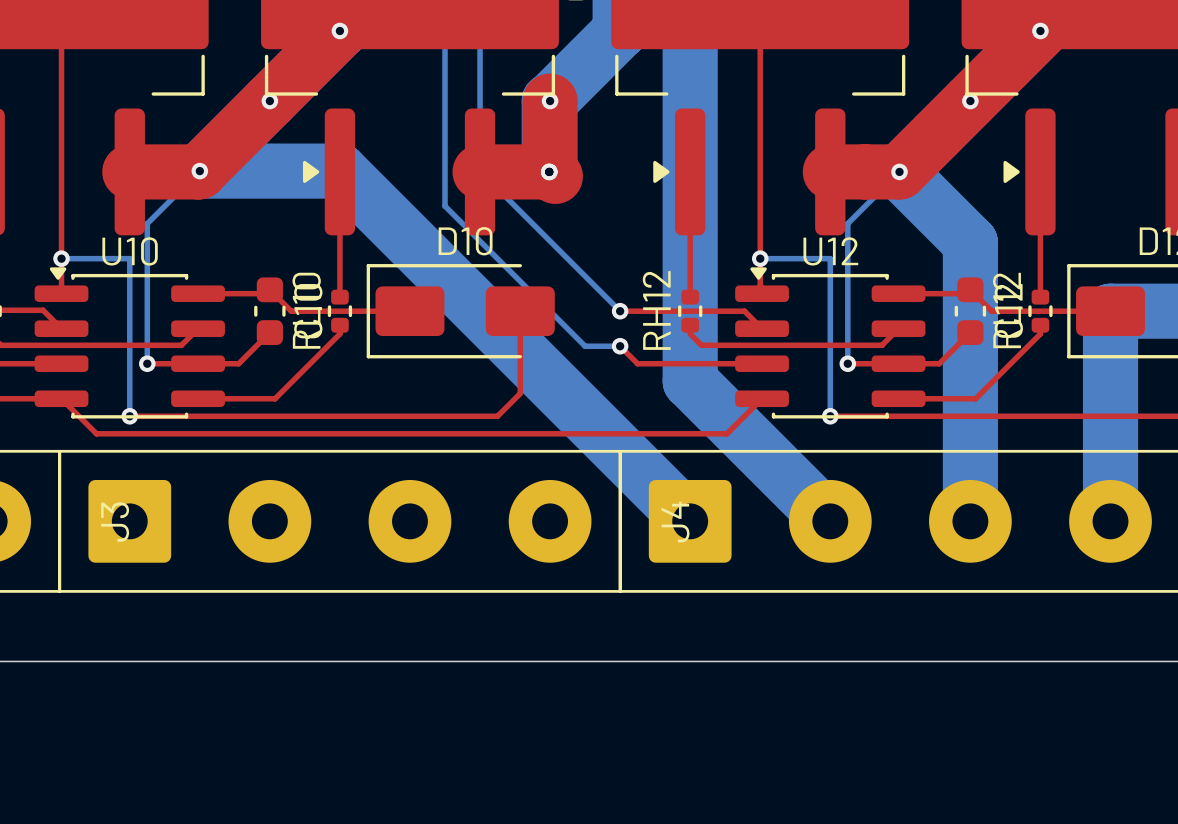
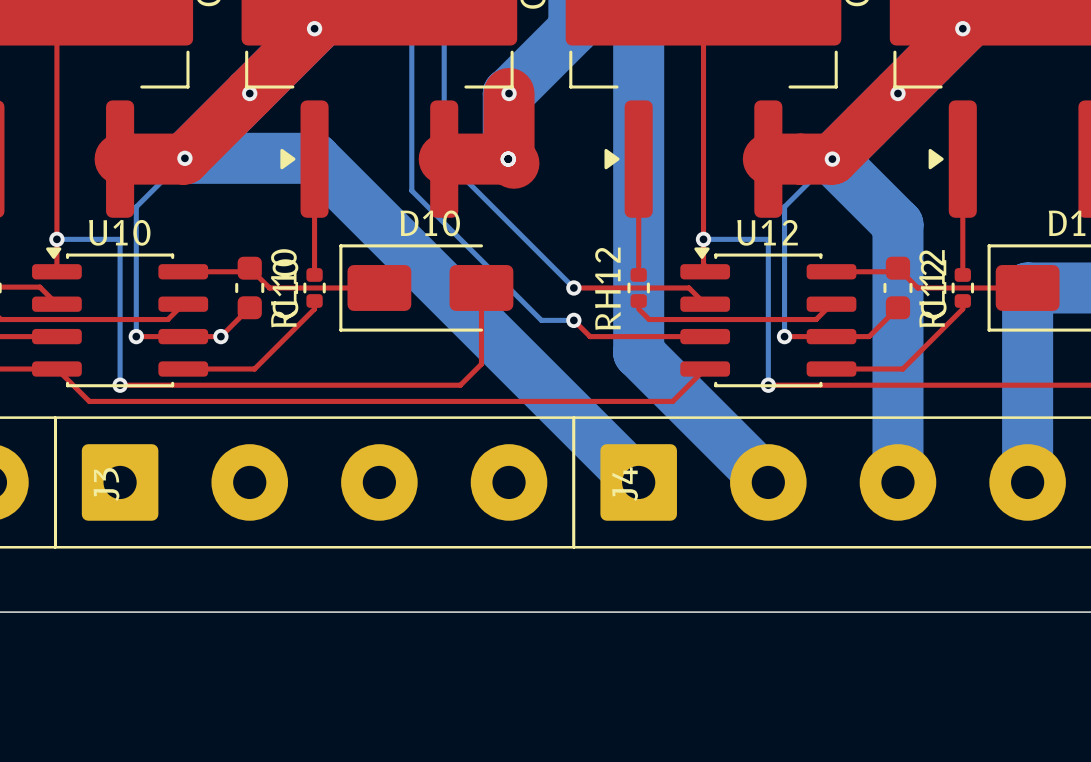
via: none -> (220, 336)

